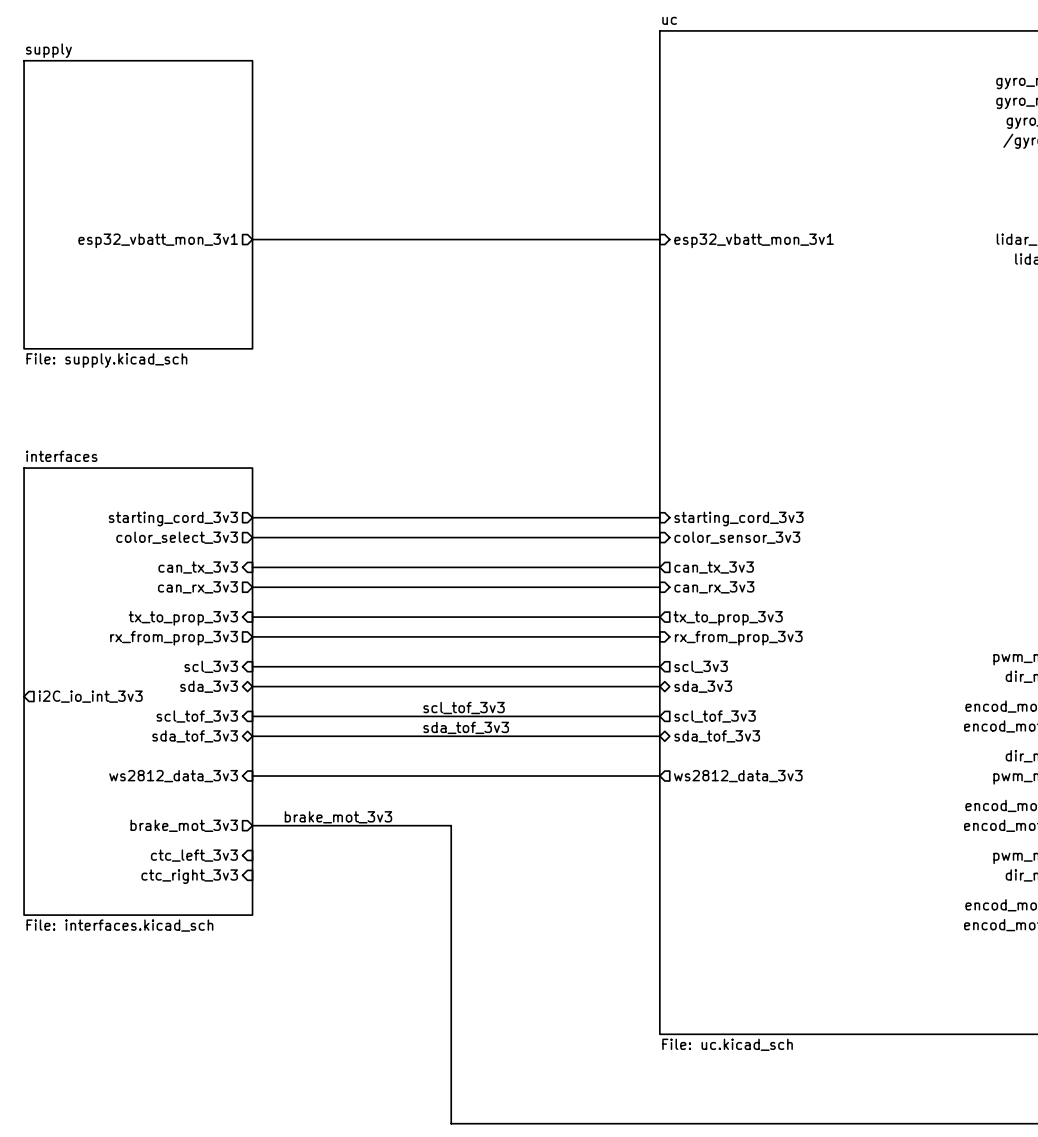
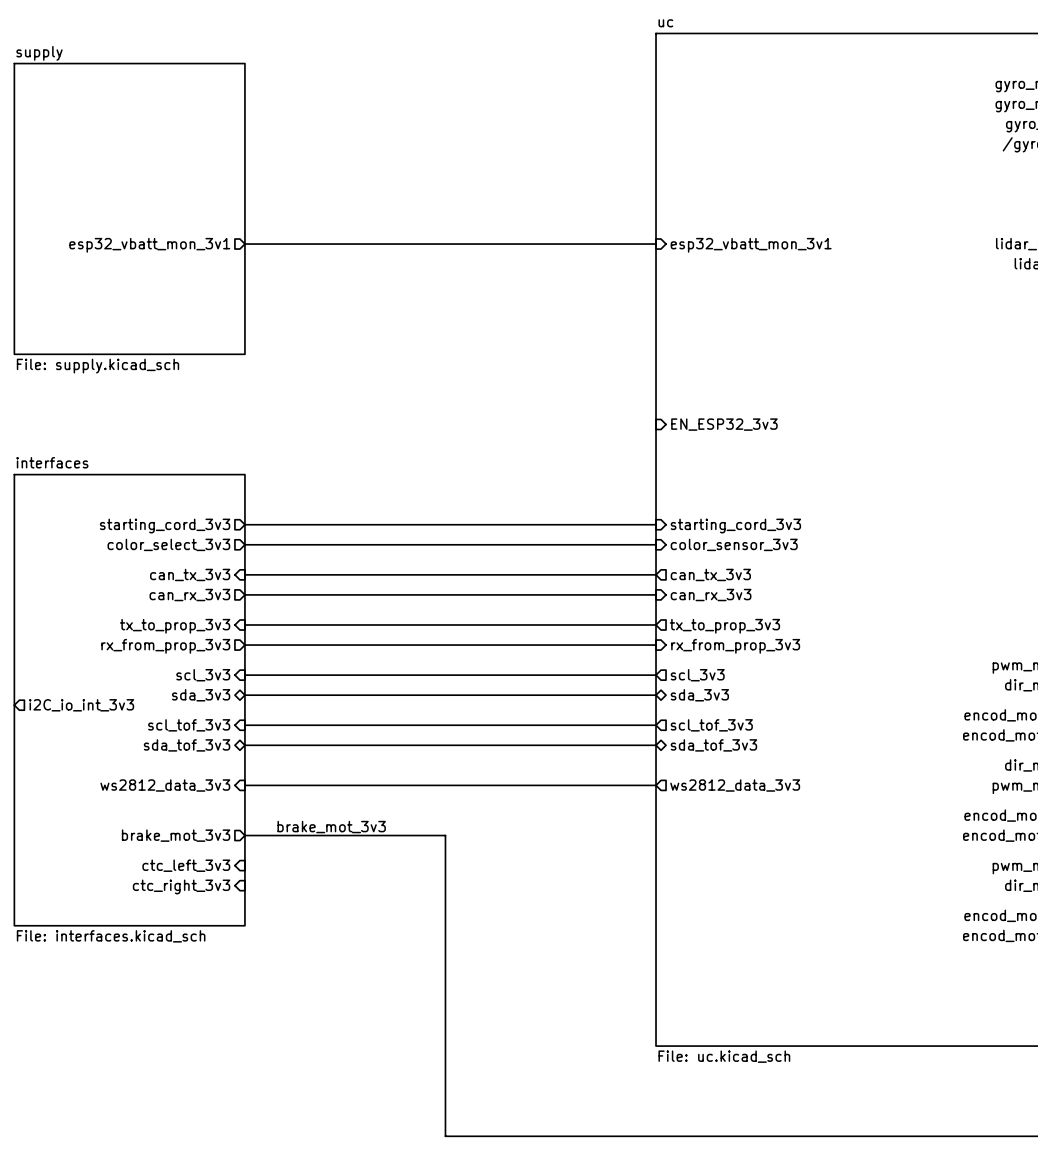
sheet pin: none -> EN_ESP32_3v3 (724, 424)
label: scl_tof_3v3 (464, 708) -> none
label: sda_tof_3v3 (466, 727) -> none

